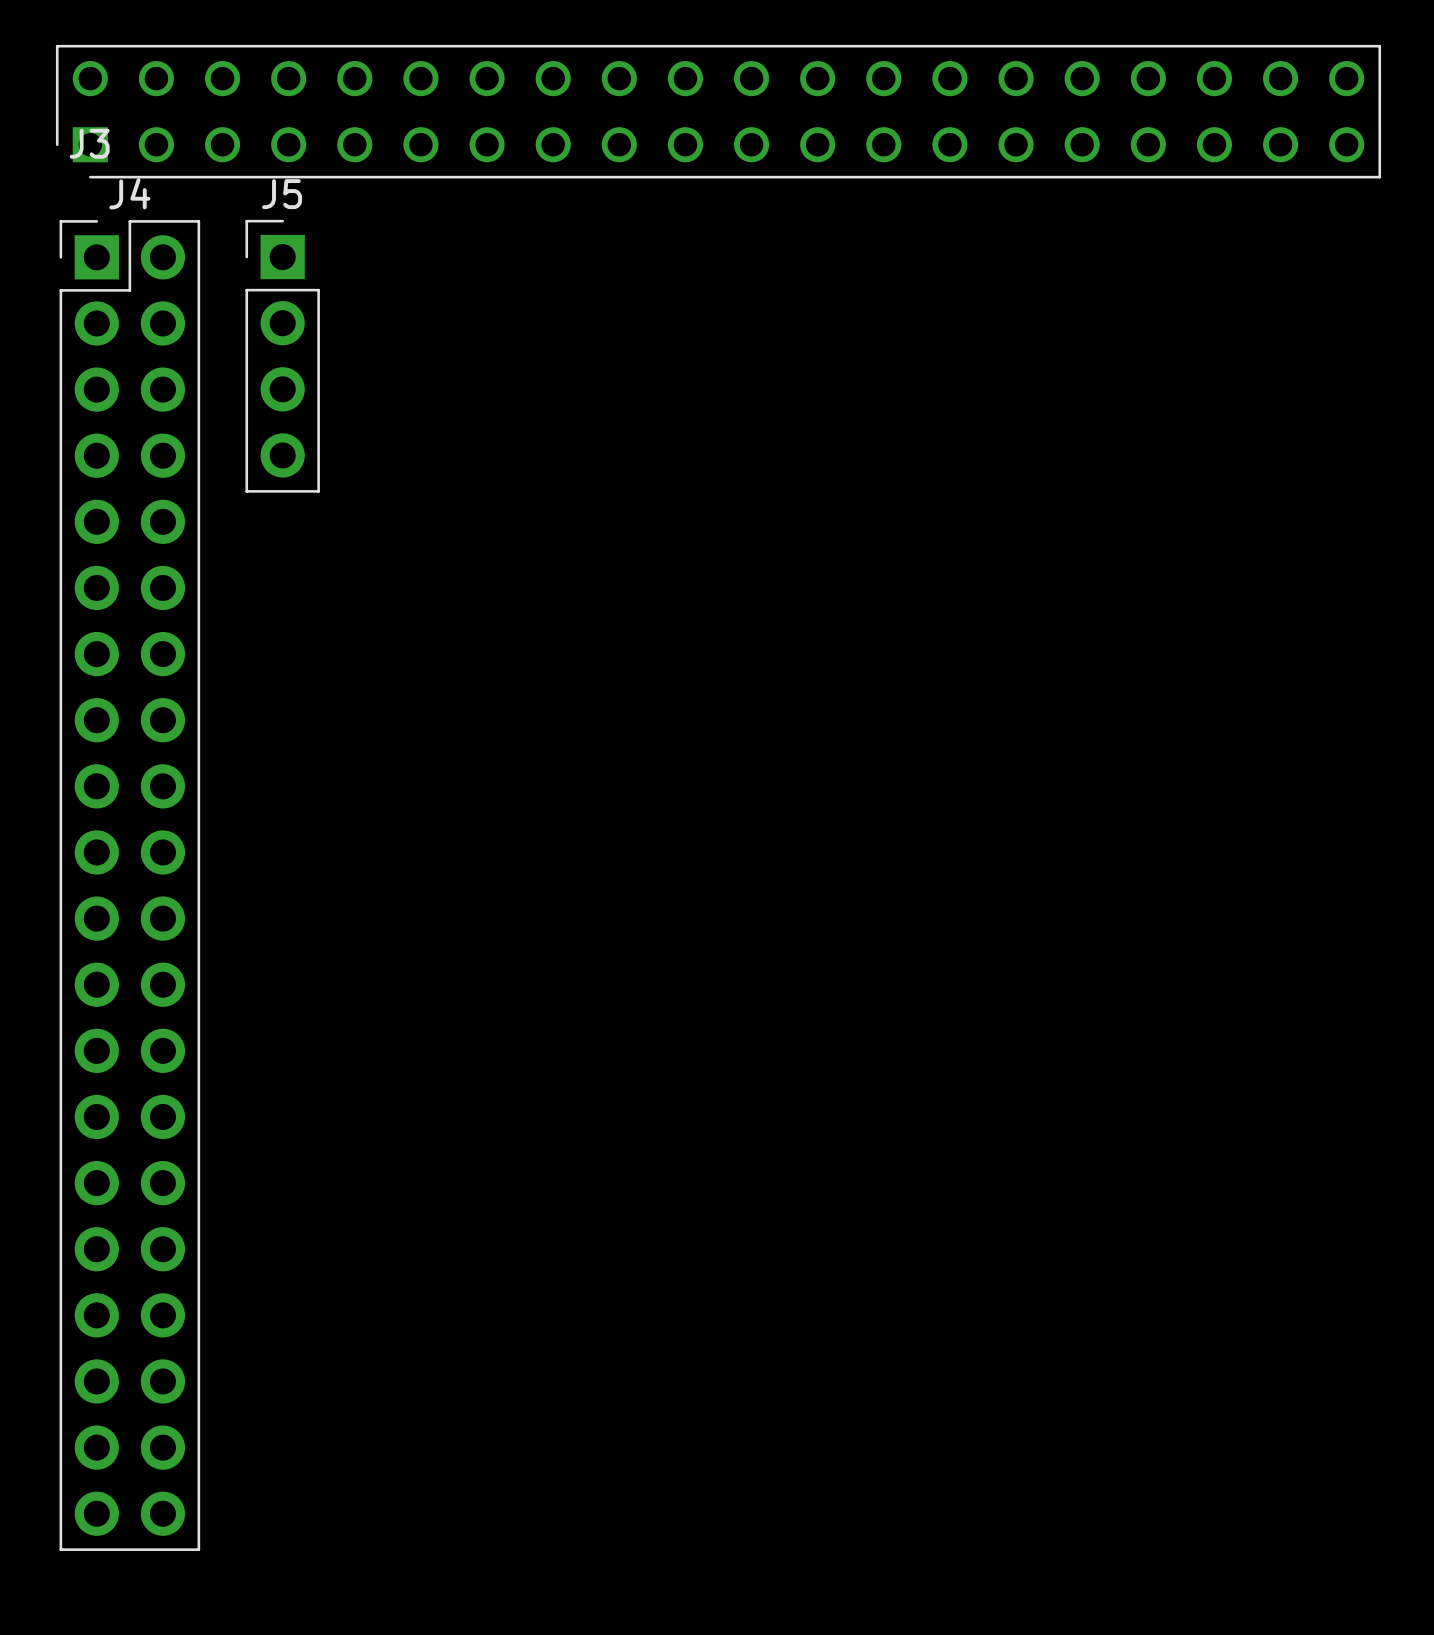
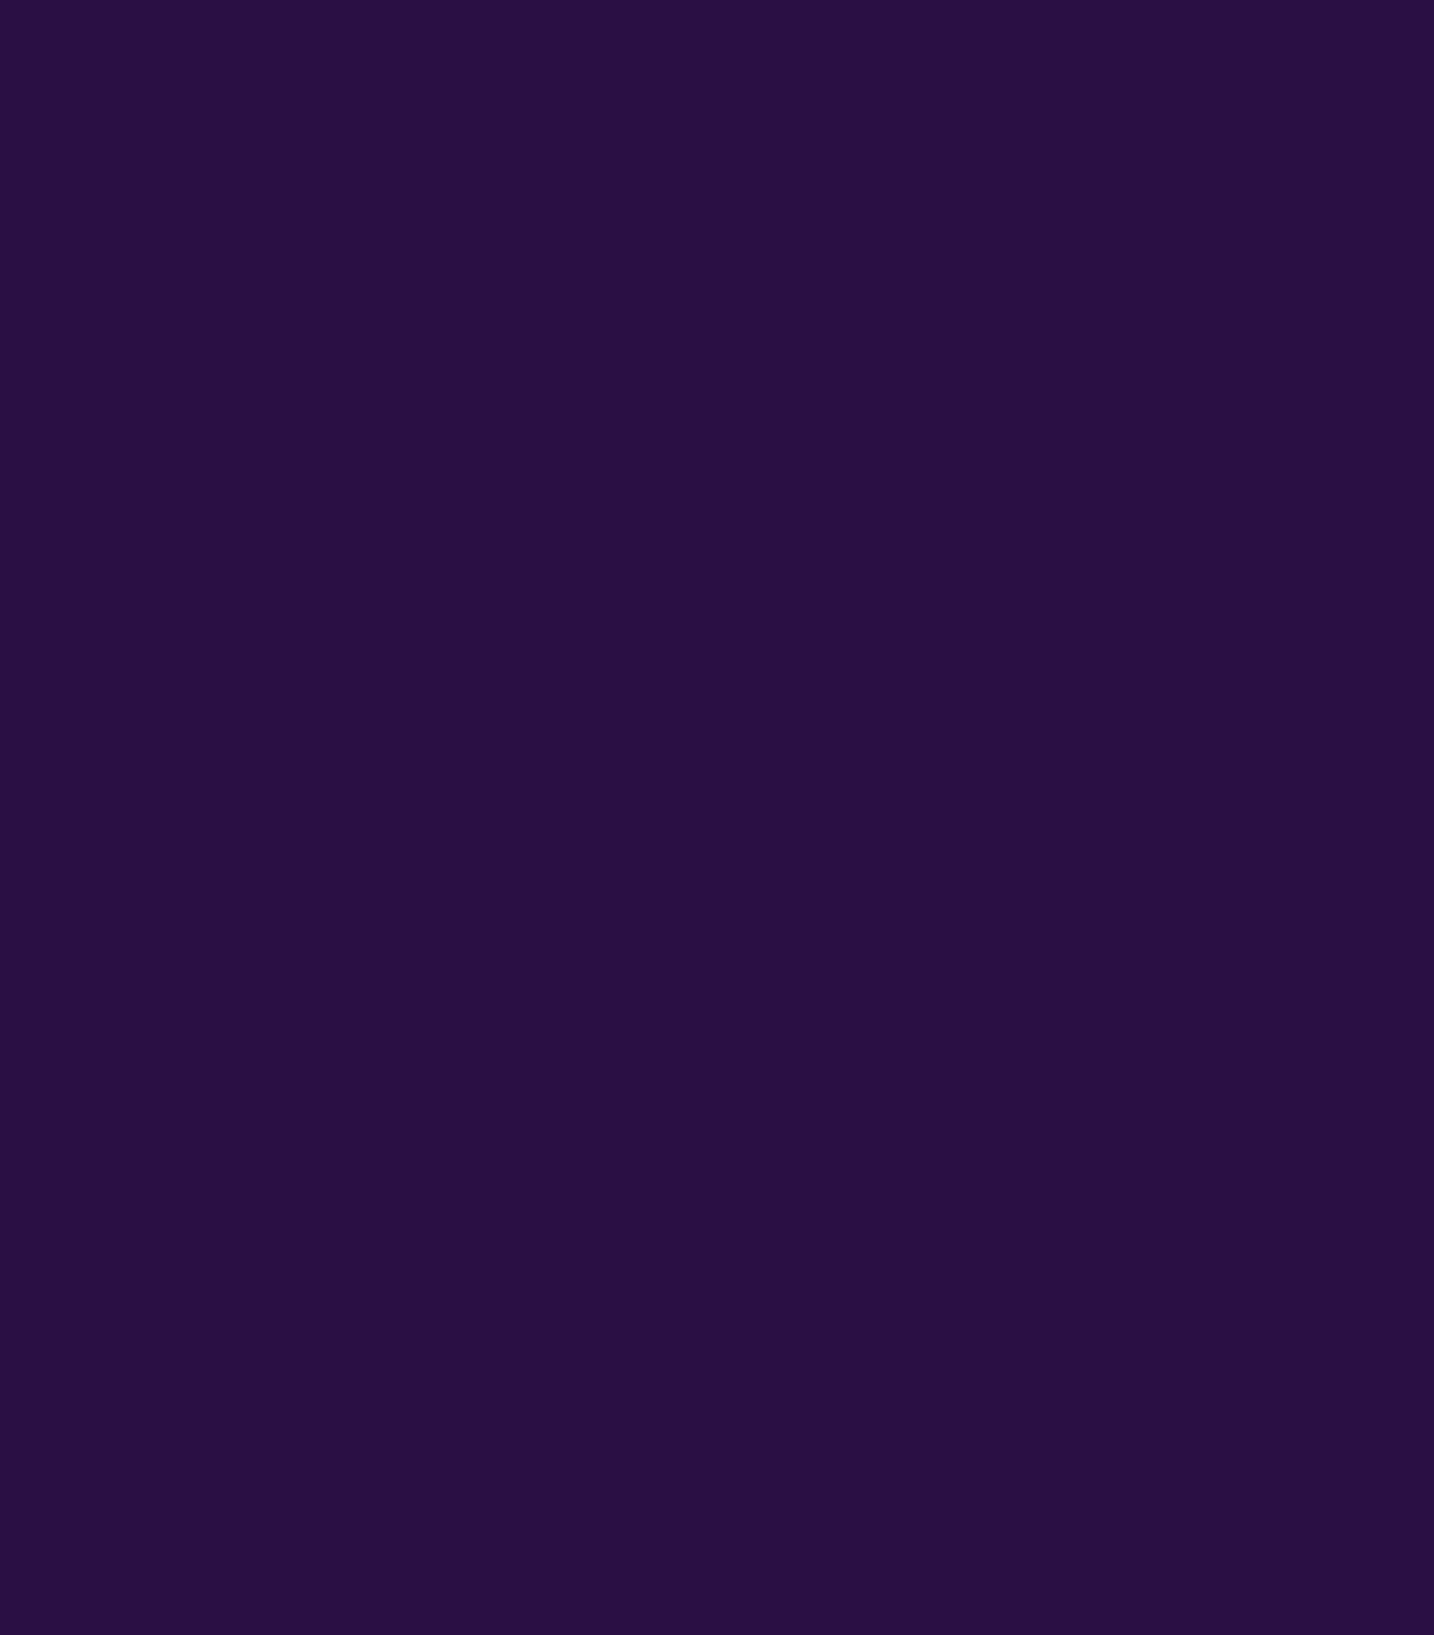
J3: (718, 111) -> none
J5: (282, 356) -> none
J4: (129, 885) -> none

